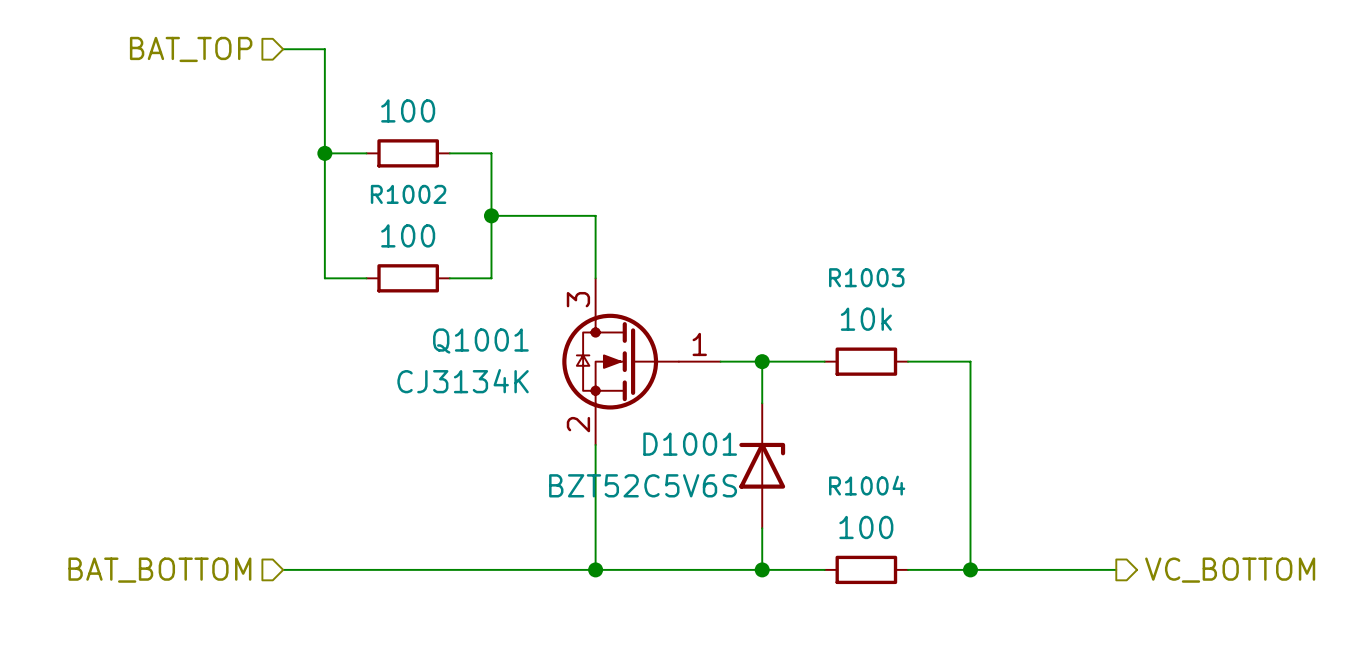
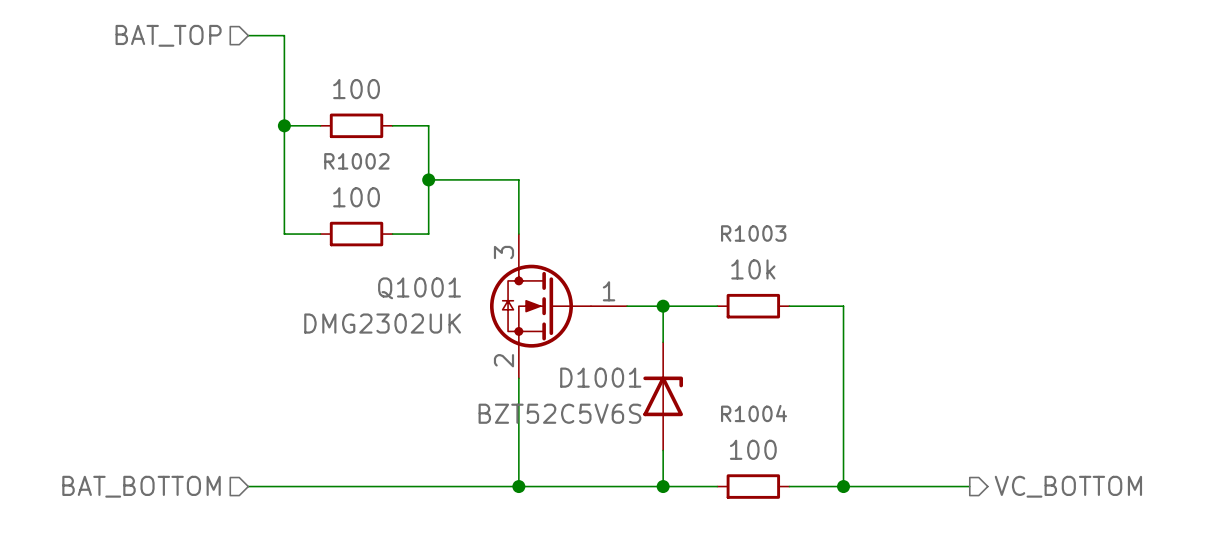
Q1001 value: CJ3134K (463, 381) -> DMG2302UK (382, 323)

